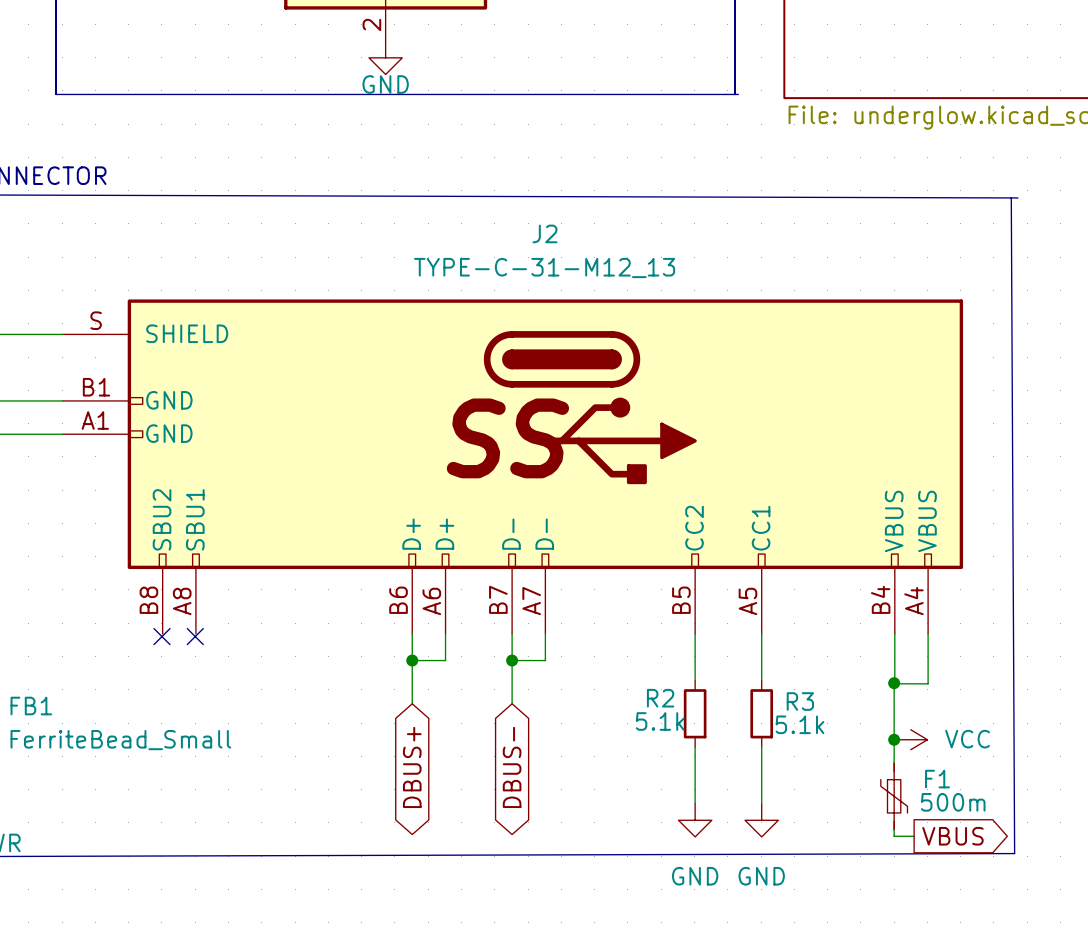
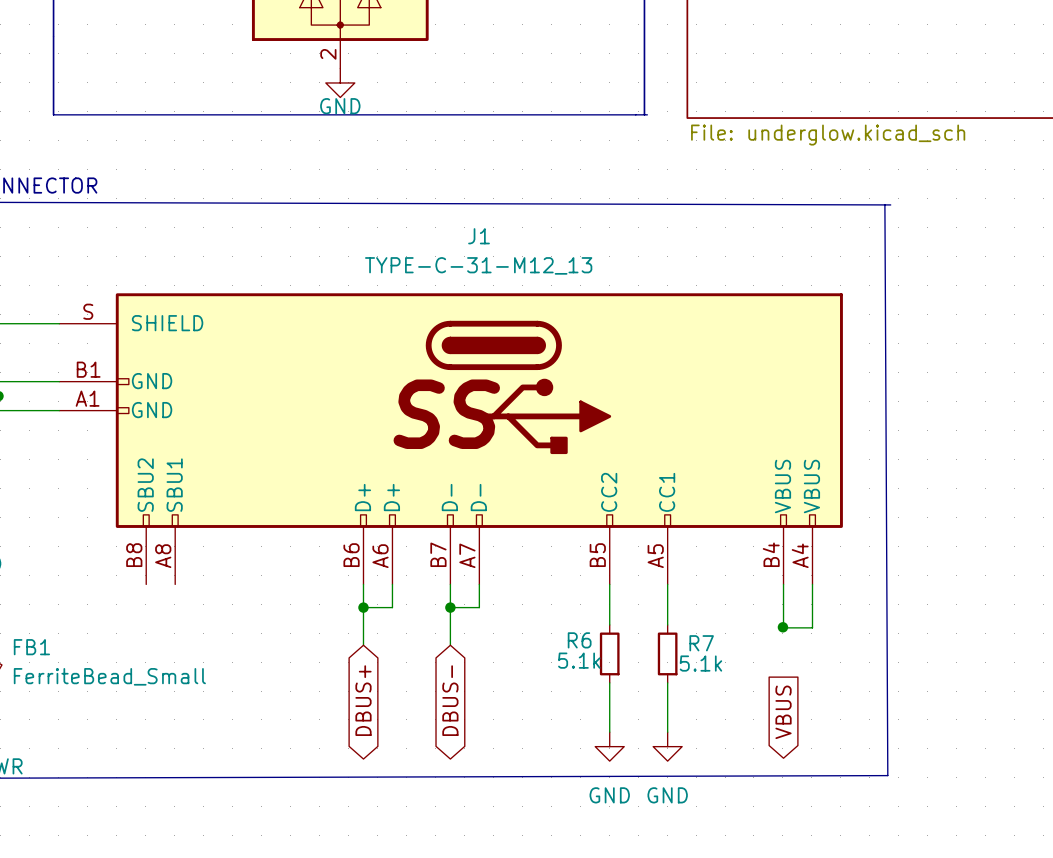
J2 name: J2 (544, 233) -> J1 (479, 236)
no-connect mark: (161, 636) -> none
no-connect mark: (195, 636) -> none
wire: (894, 683) (894, 763) -> none
R2 name: R2 (660, 698) -> R6 (579, 640)
R3 name: R3 (800, 701) -> R7 (701, 643)
junction: (894, 739) -> none
power symbol: VCC (910, 739) -> none
F1: 500m (894, 796) -> none
wire: (894, 829) (894, 836) (914, 836) -> none
global label rotation: 0° (952, 836) -> 90° clockwise (783, 712)

